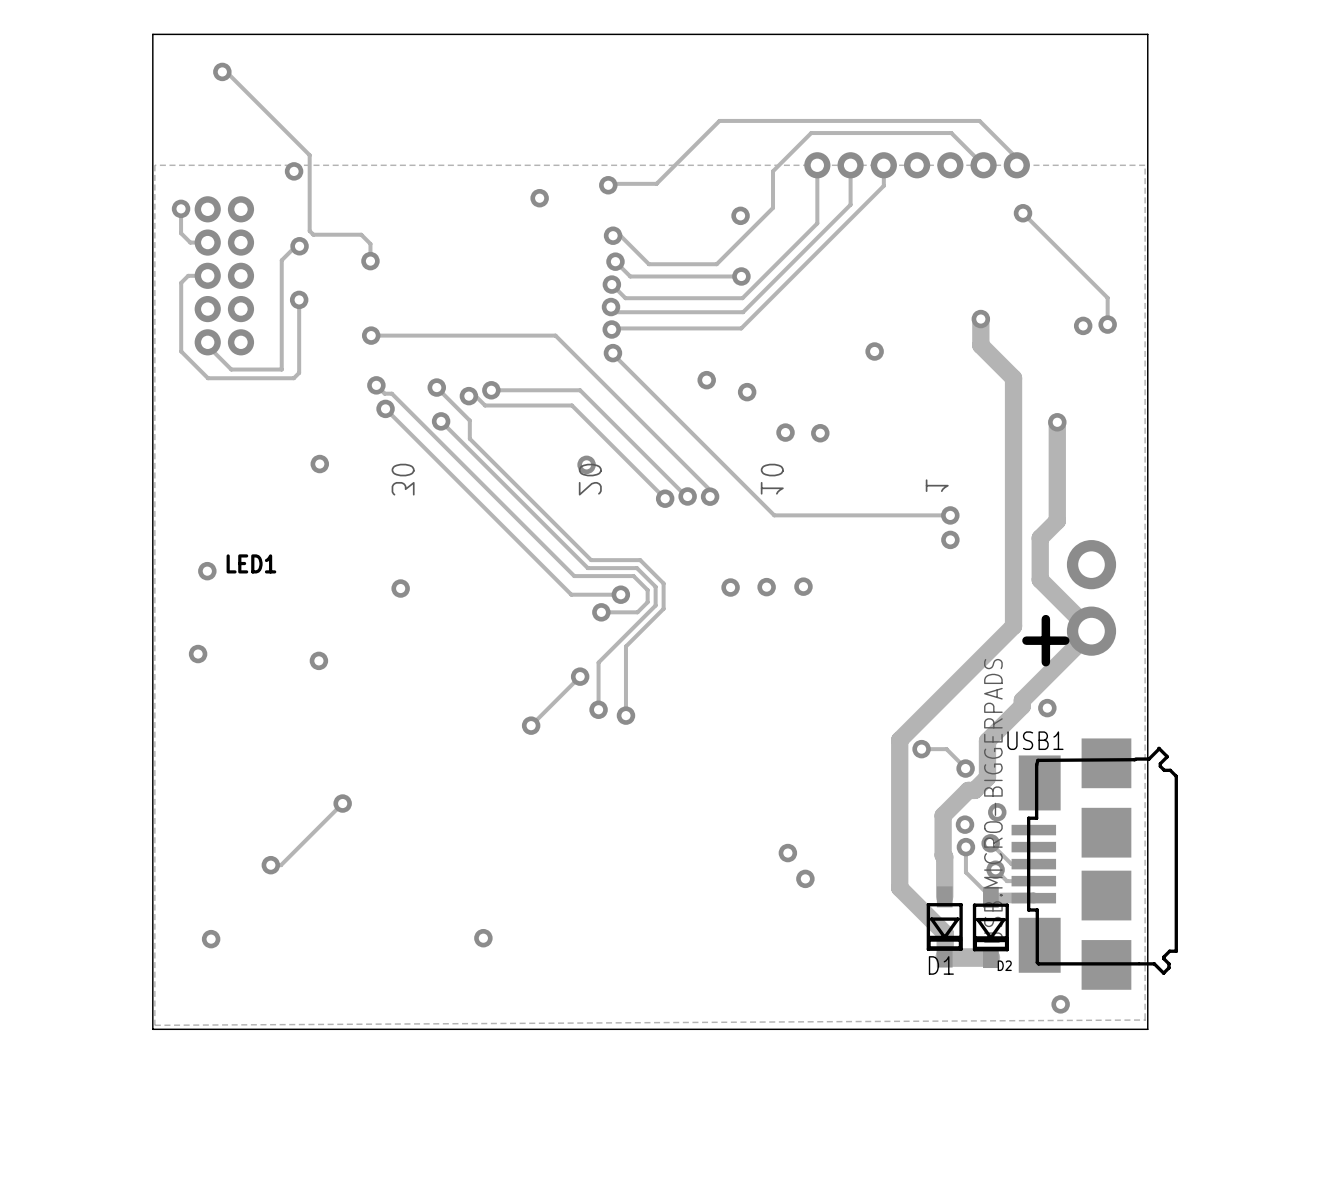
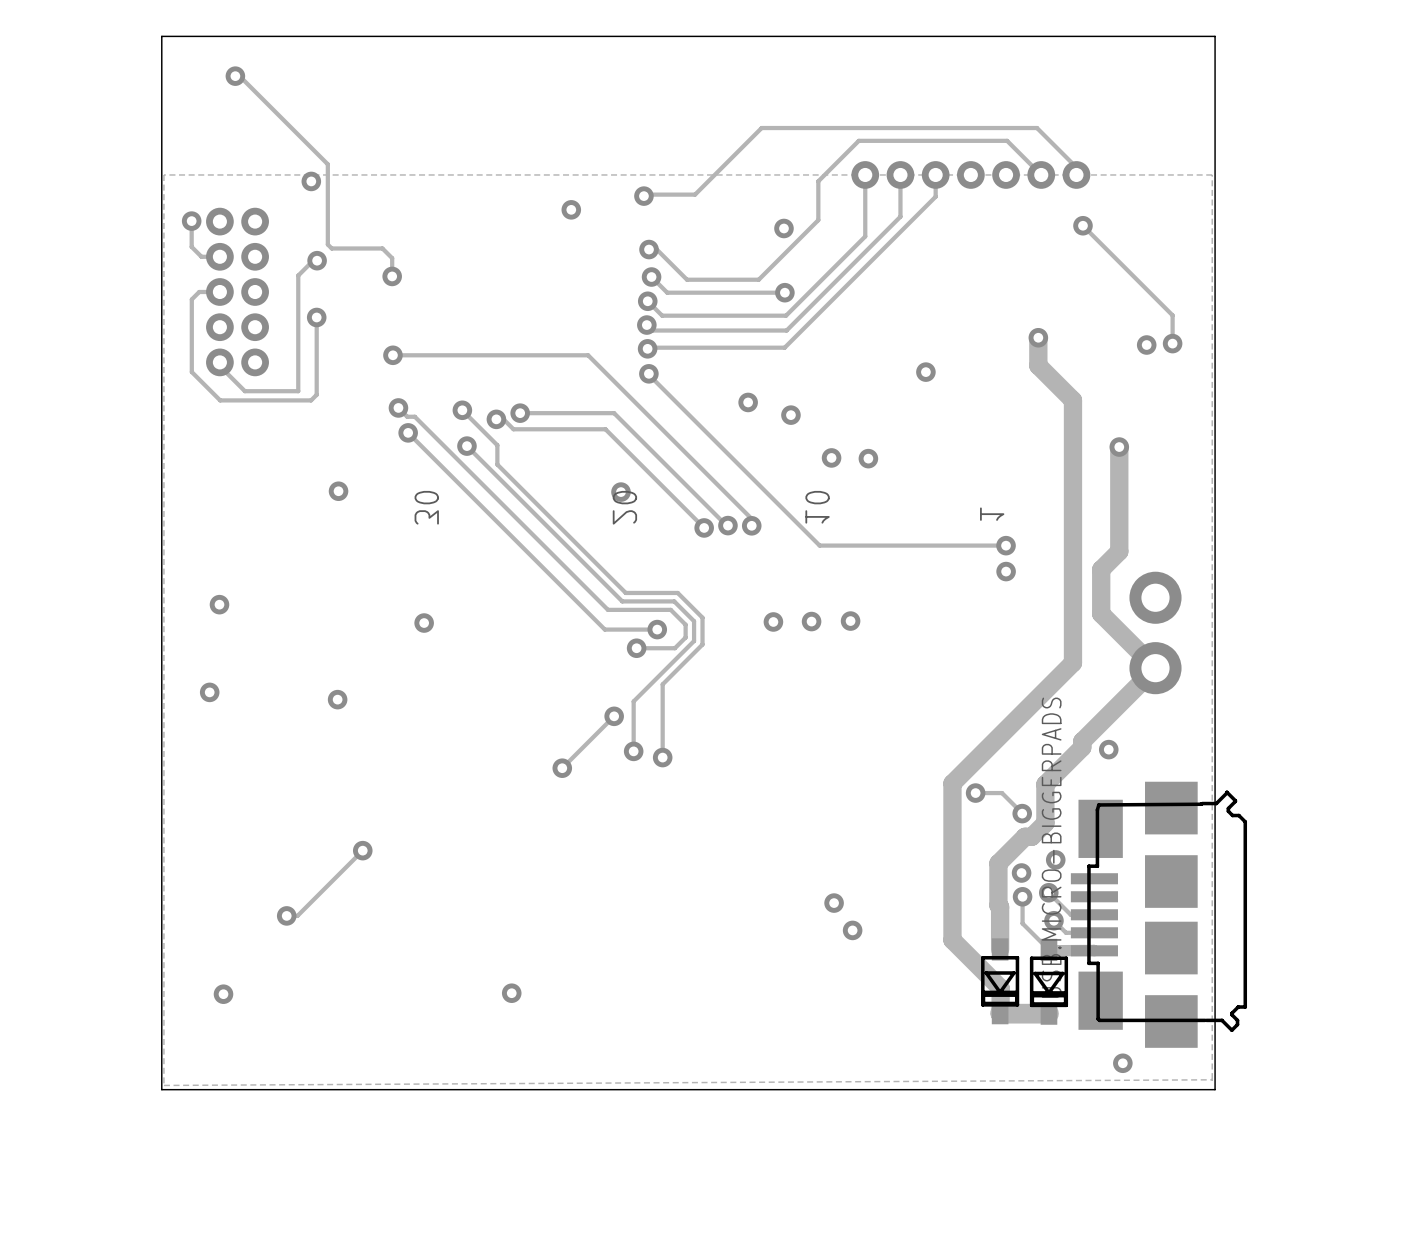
LED1: (251, 563) -> none
text: + (1045, 640) -> none
USB1 name: USB1 (1035, 740) -> none
D1 name: D1 (941, 965) -> none
D2 name: D2 (1004, 965) -> none

